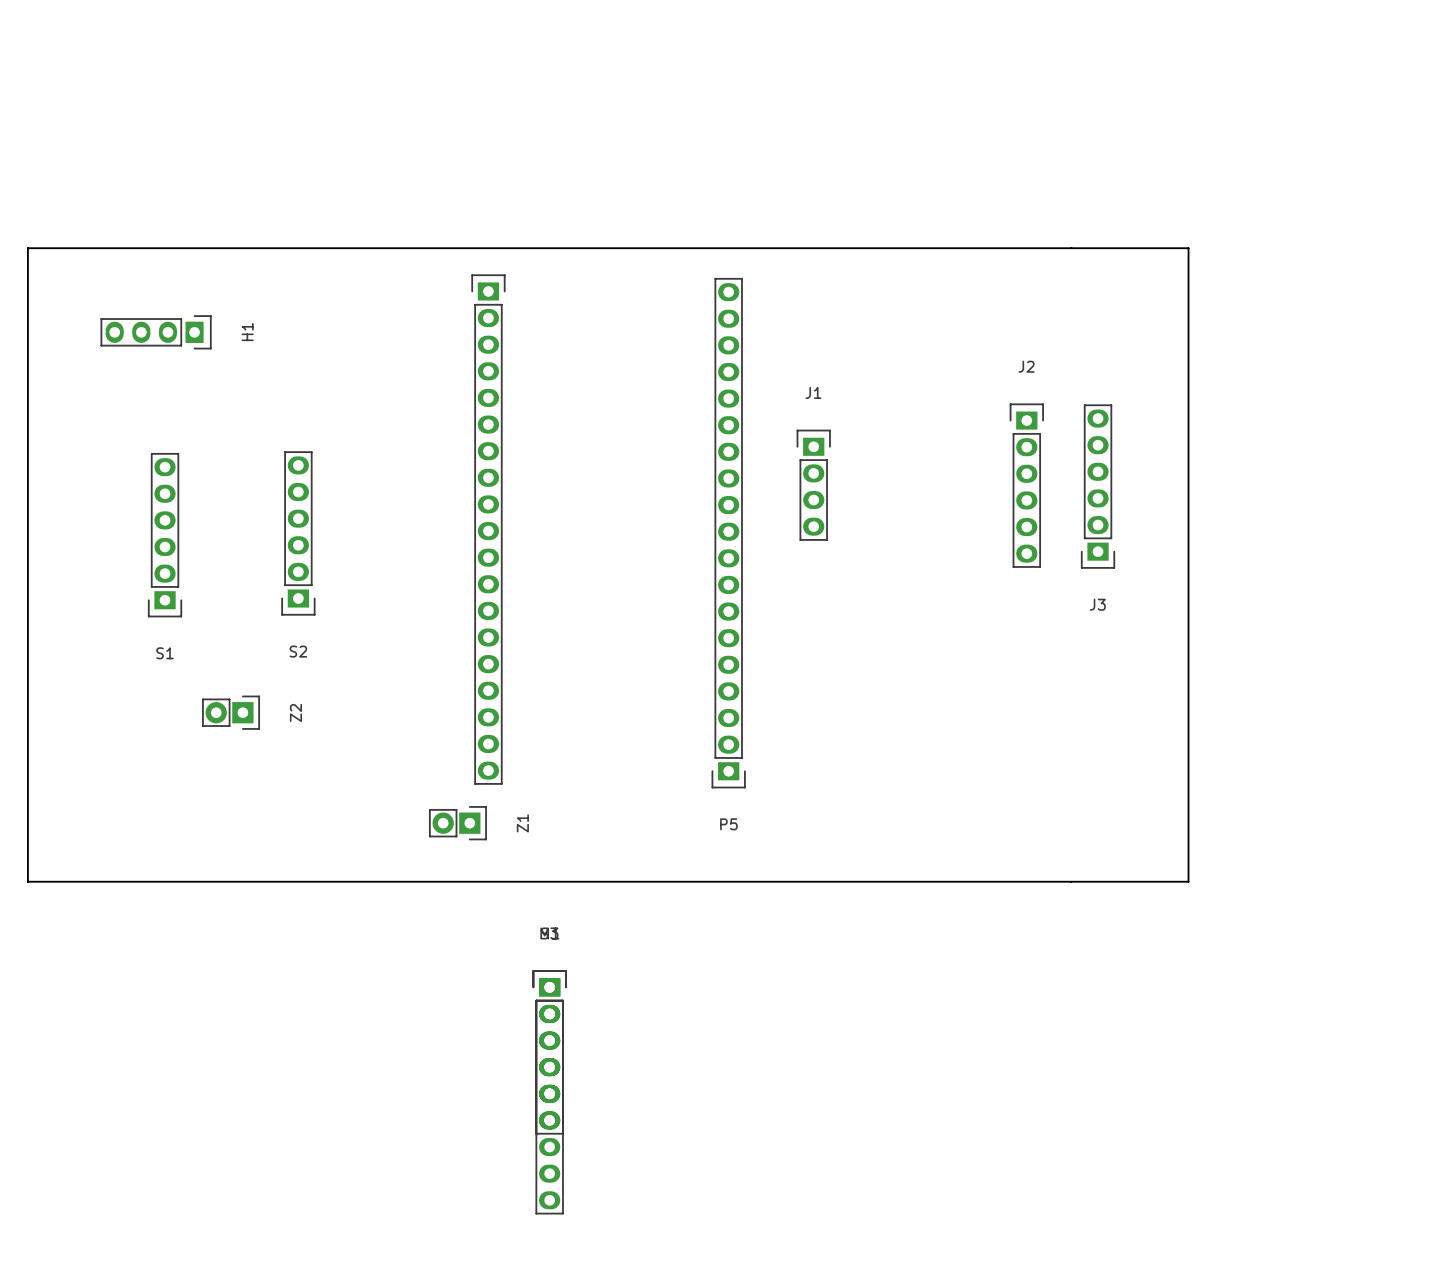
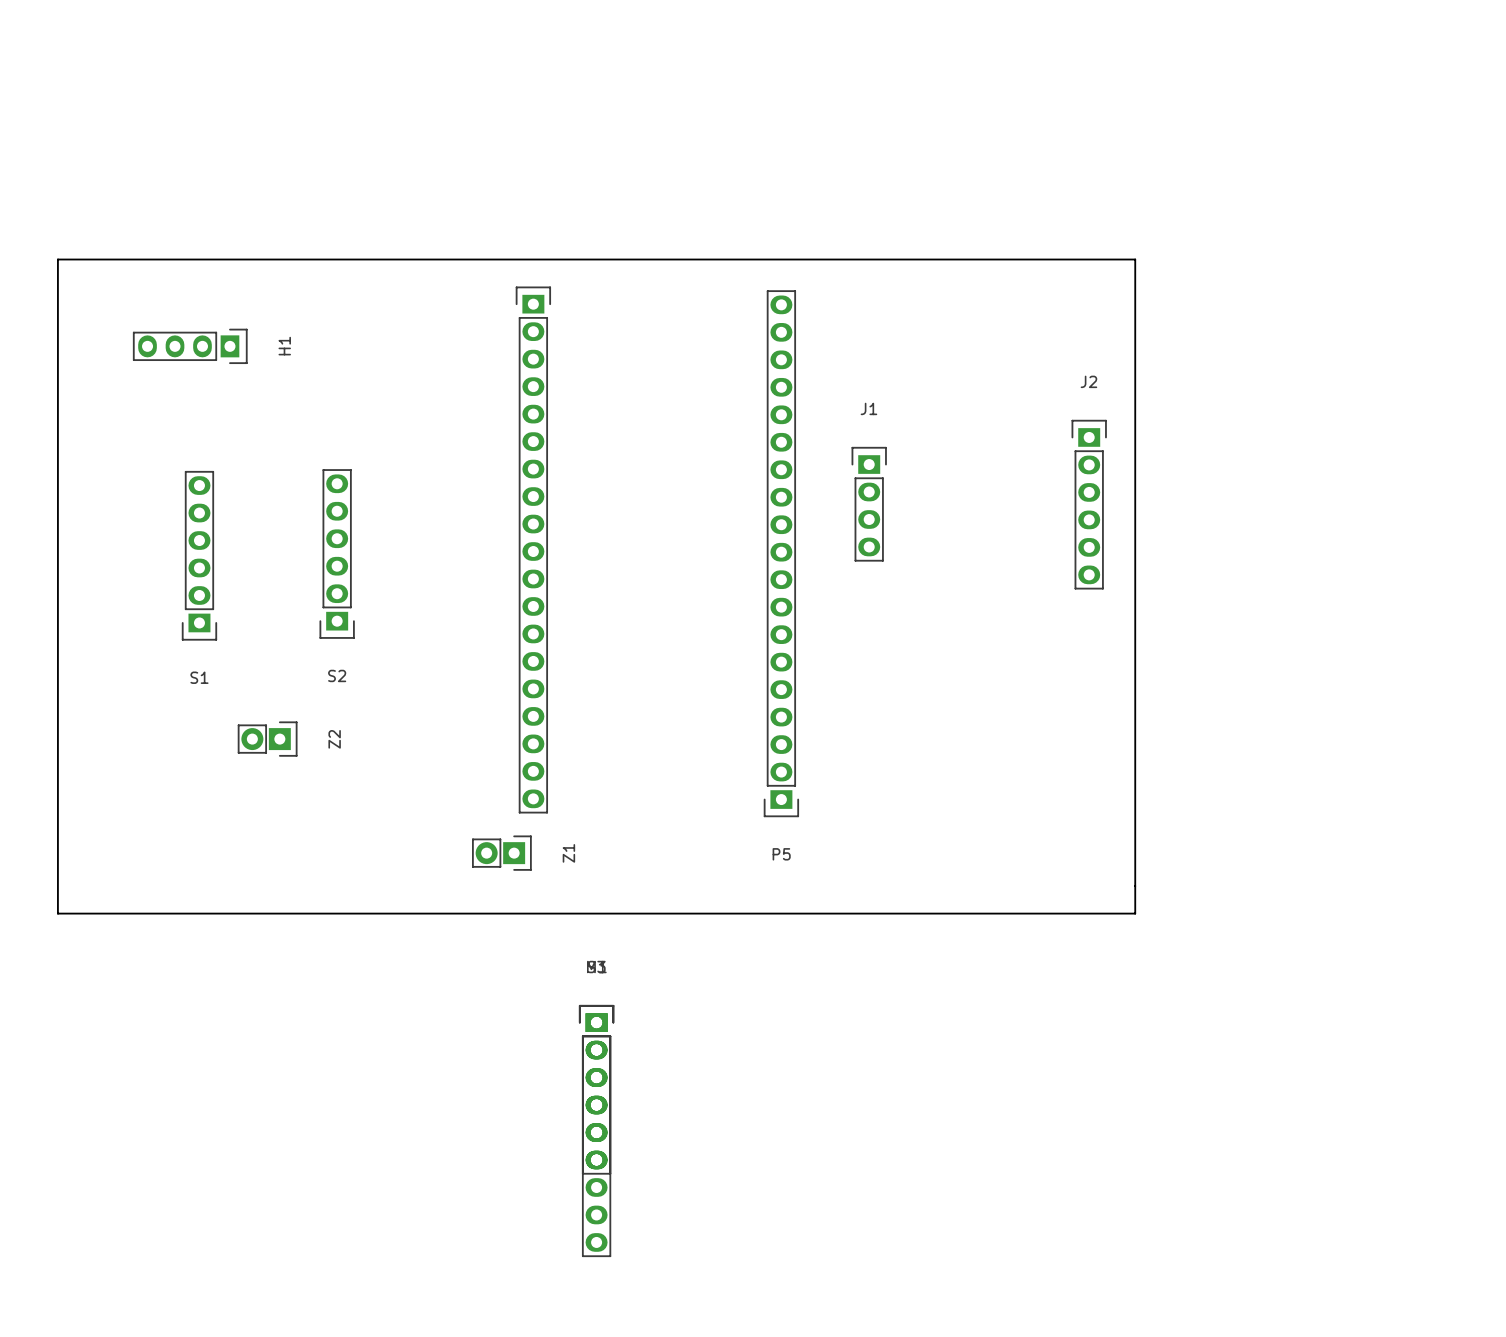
board edge: (1071, 248) (1188, 248) (1188, 881) (1071, 881) -> (1135, 259) (1135, 913)
J3: (1098, 486) -> none

